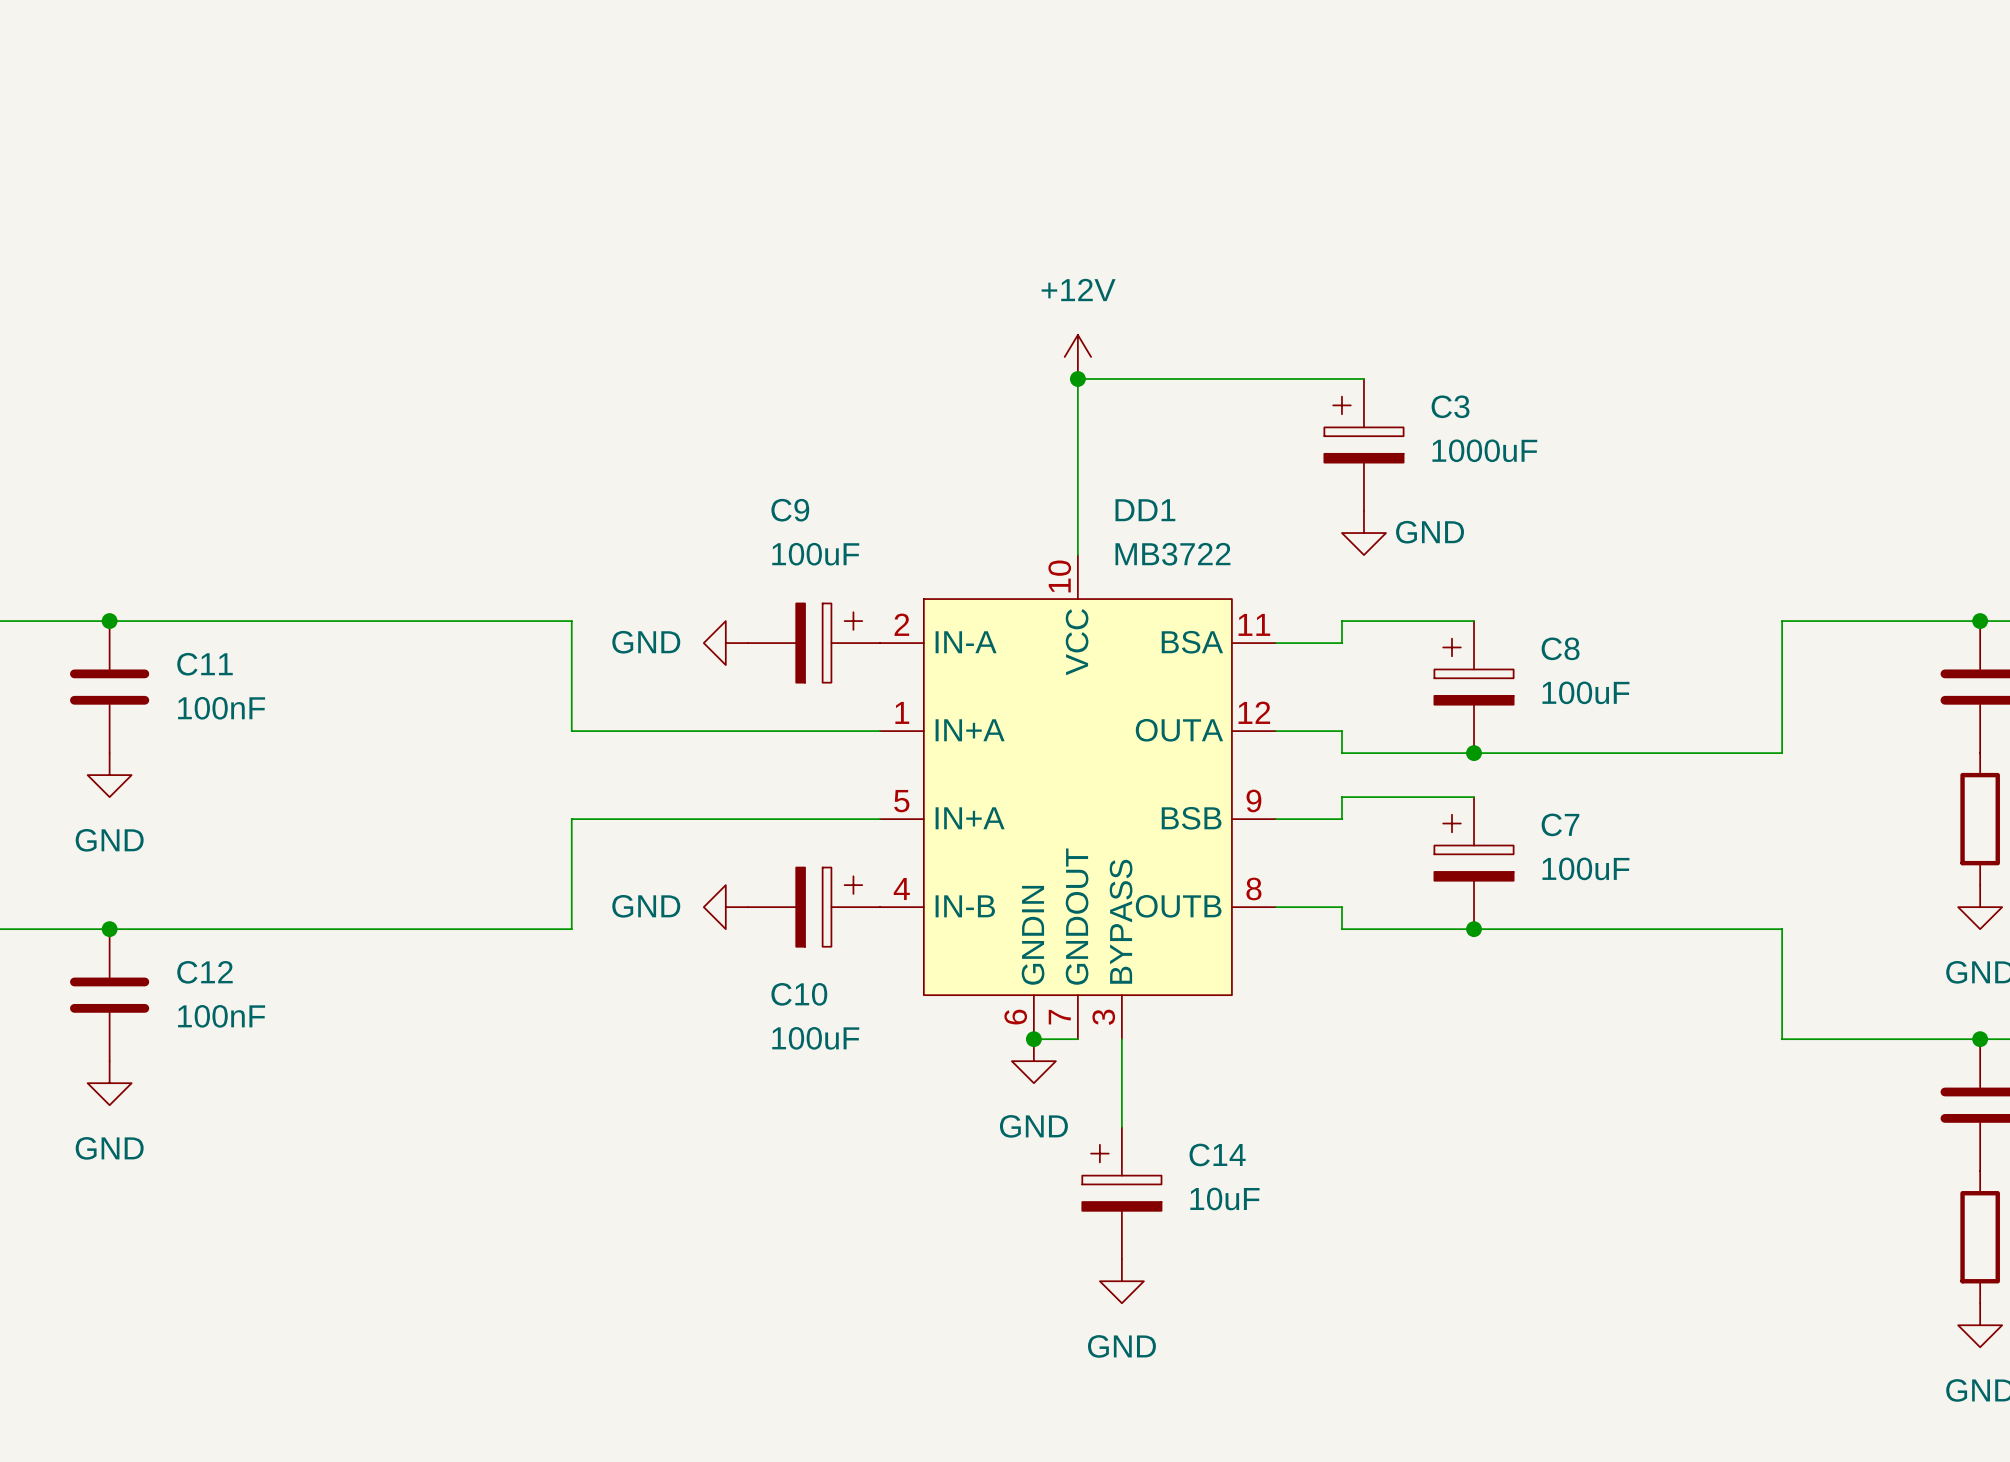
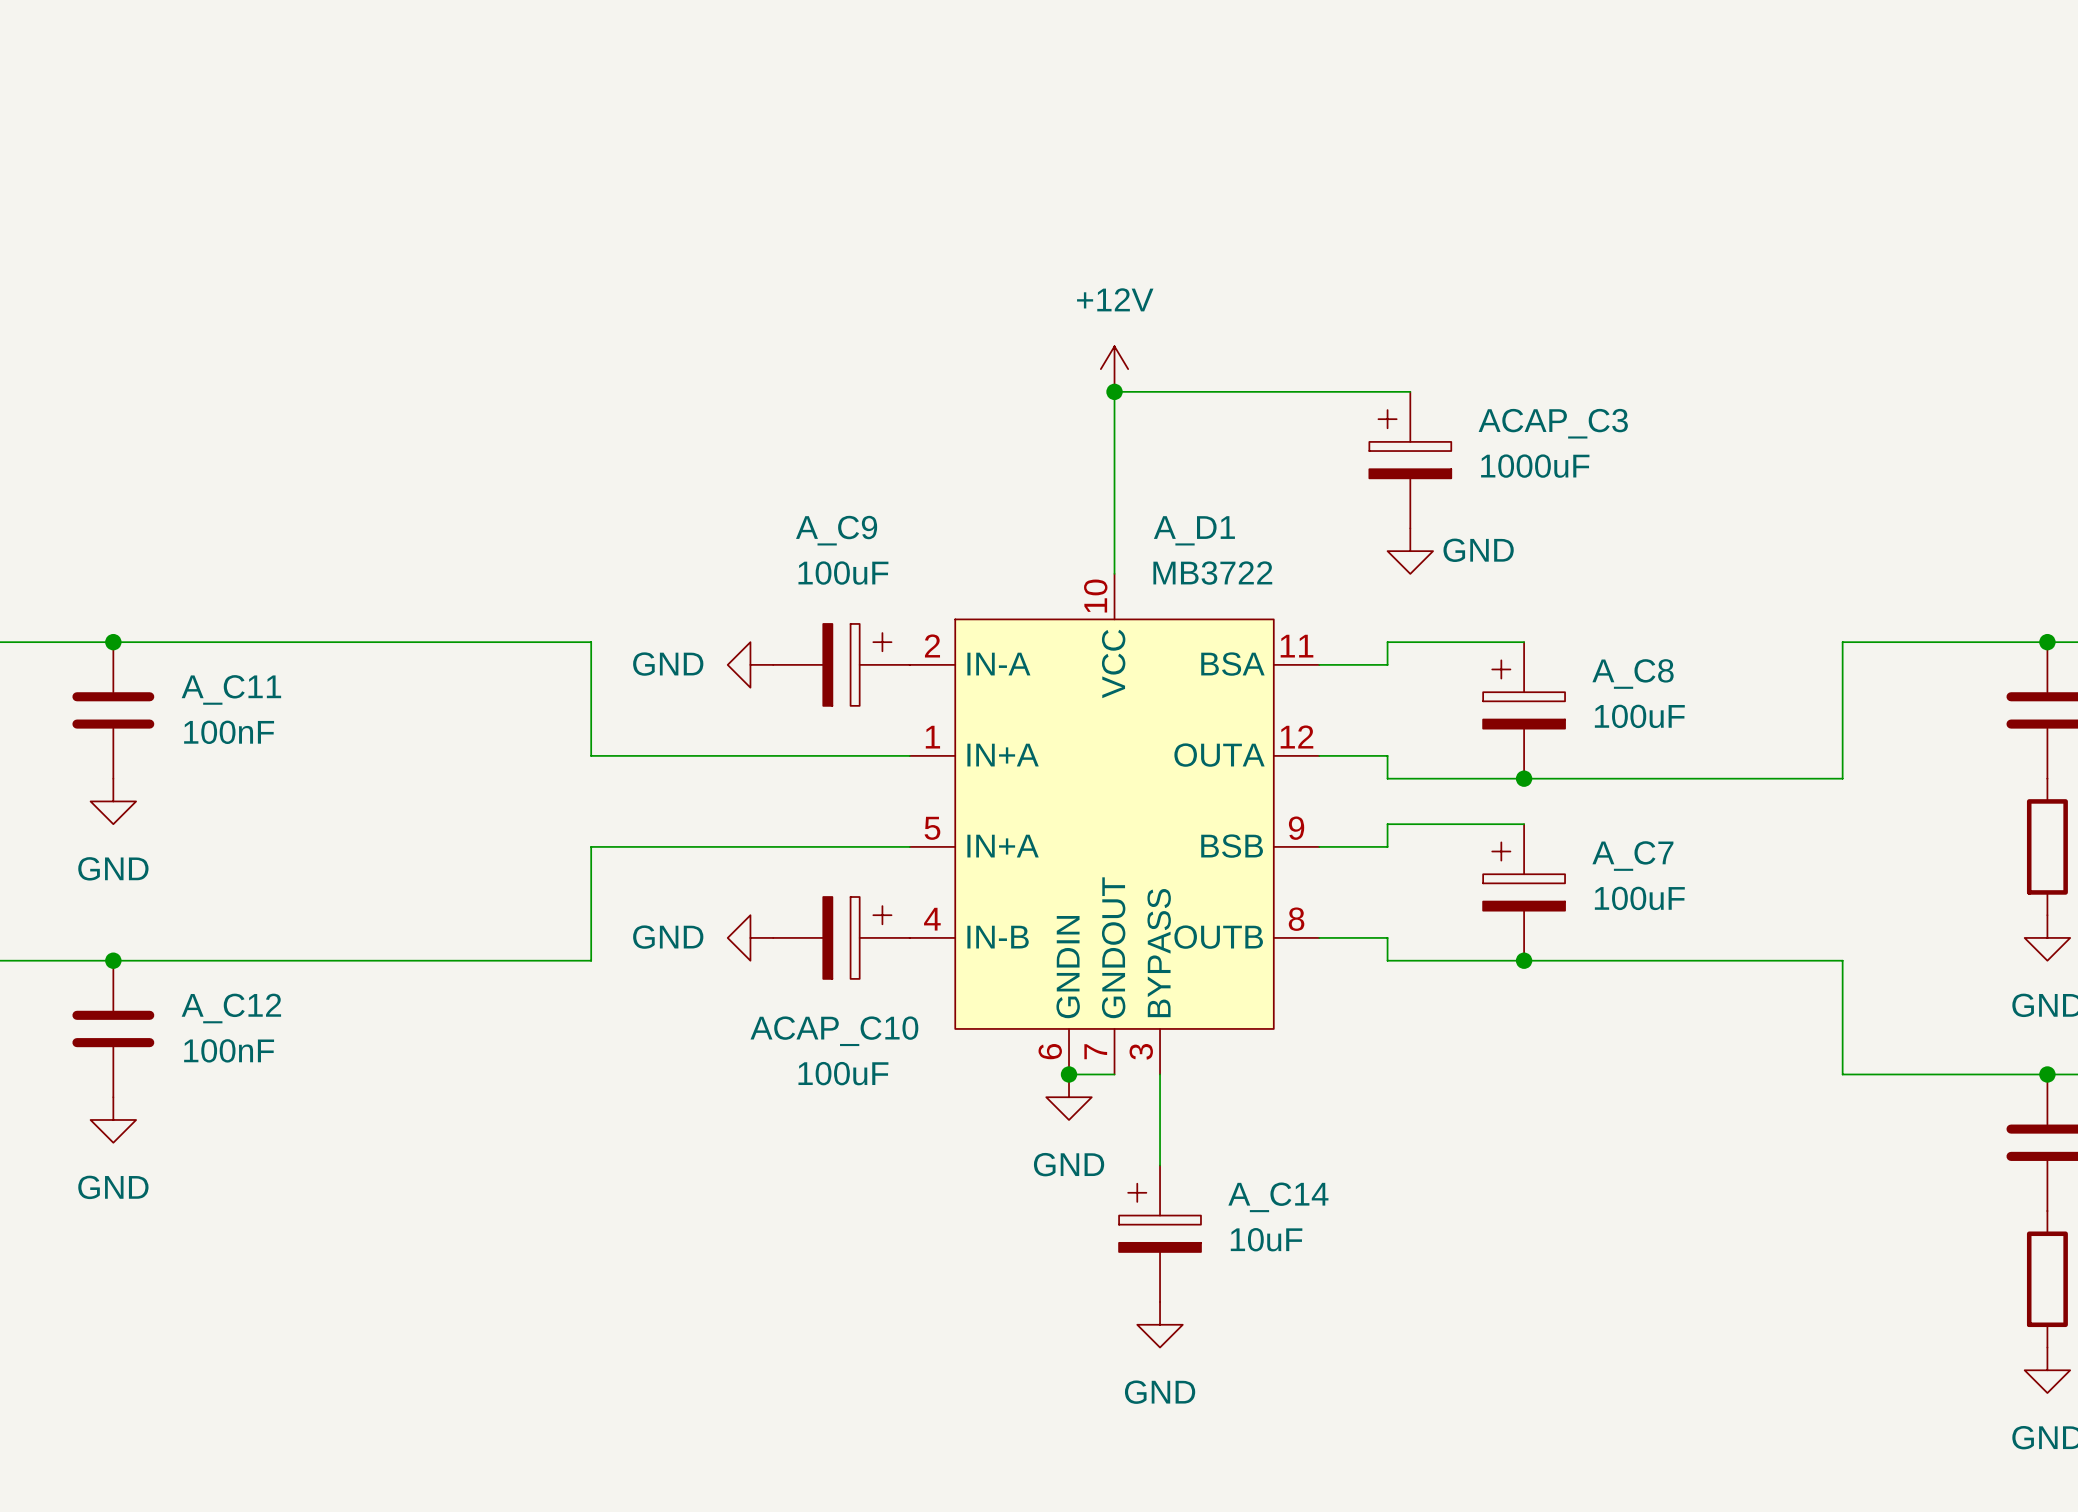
C3 name: C3 (1450, 406) -> ACAP_C3 (1553, 423)
C9 name: C9 (790, 510) -> A_C9 (836, 530)
DD1 name: DD1 (1145, 510) -> A_D1 (1194, 530)
C8 name: C8 (1560, 648) -> A_C8 (1633, 674)
C11 name: C11 (205, 664) -> A_C11 (231, 689)
C7 name: C7 (1560, 824) -> A_C7 (1632, 856)
C12 name: C12 (204, 972) -> A_C12 (231, 1008)
C10 name: C10 (799, 994) -> ACAP_C10 (834, 1031)
C14 name: C14 (1217, 1154) -> A_C14 (1278, 1197)

